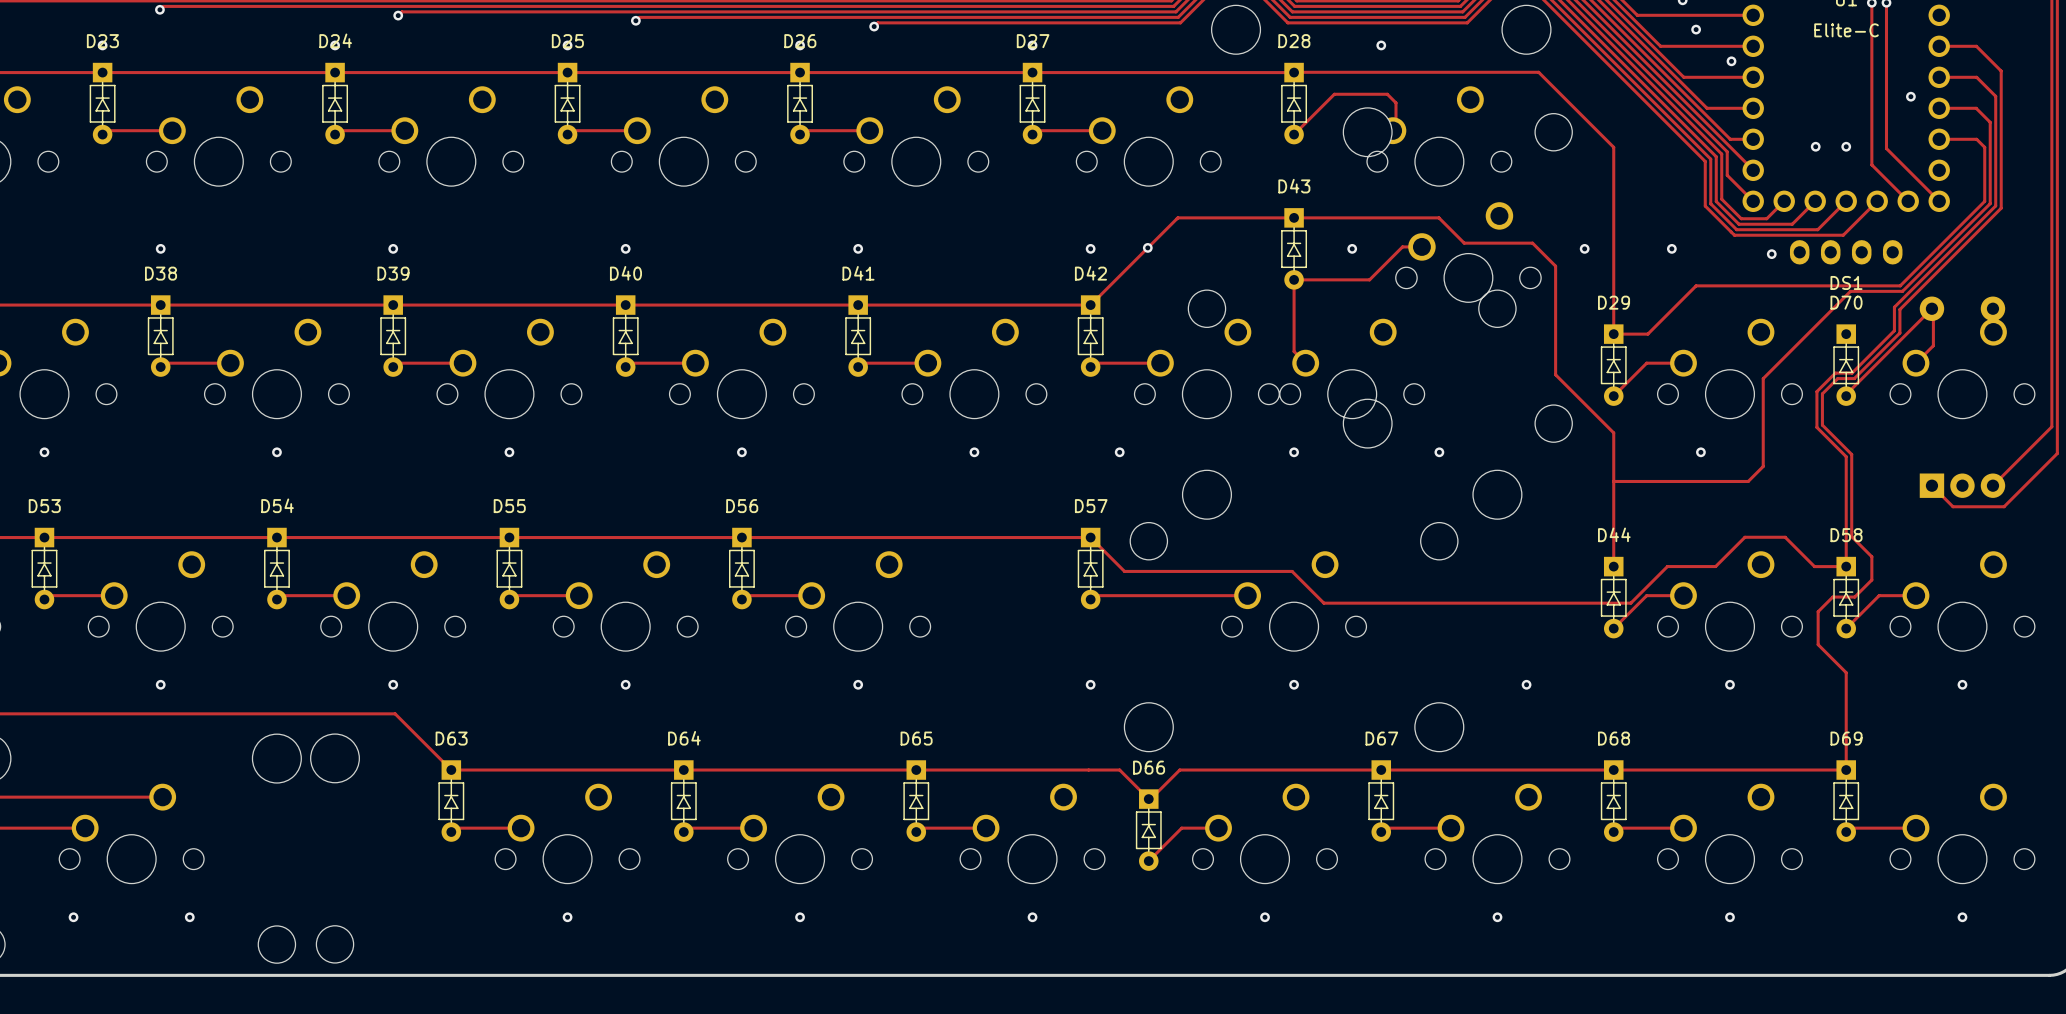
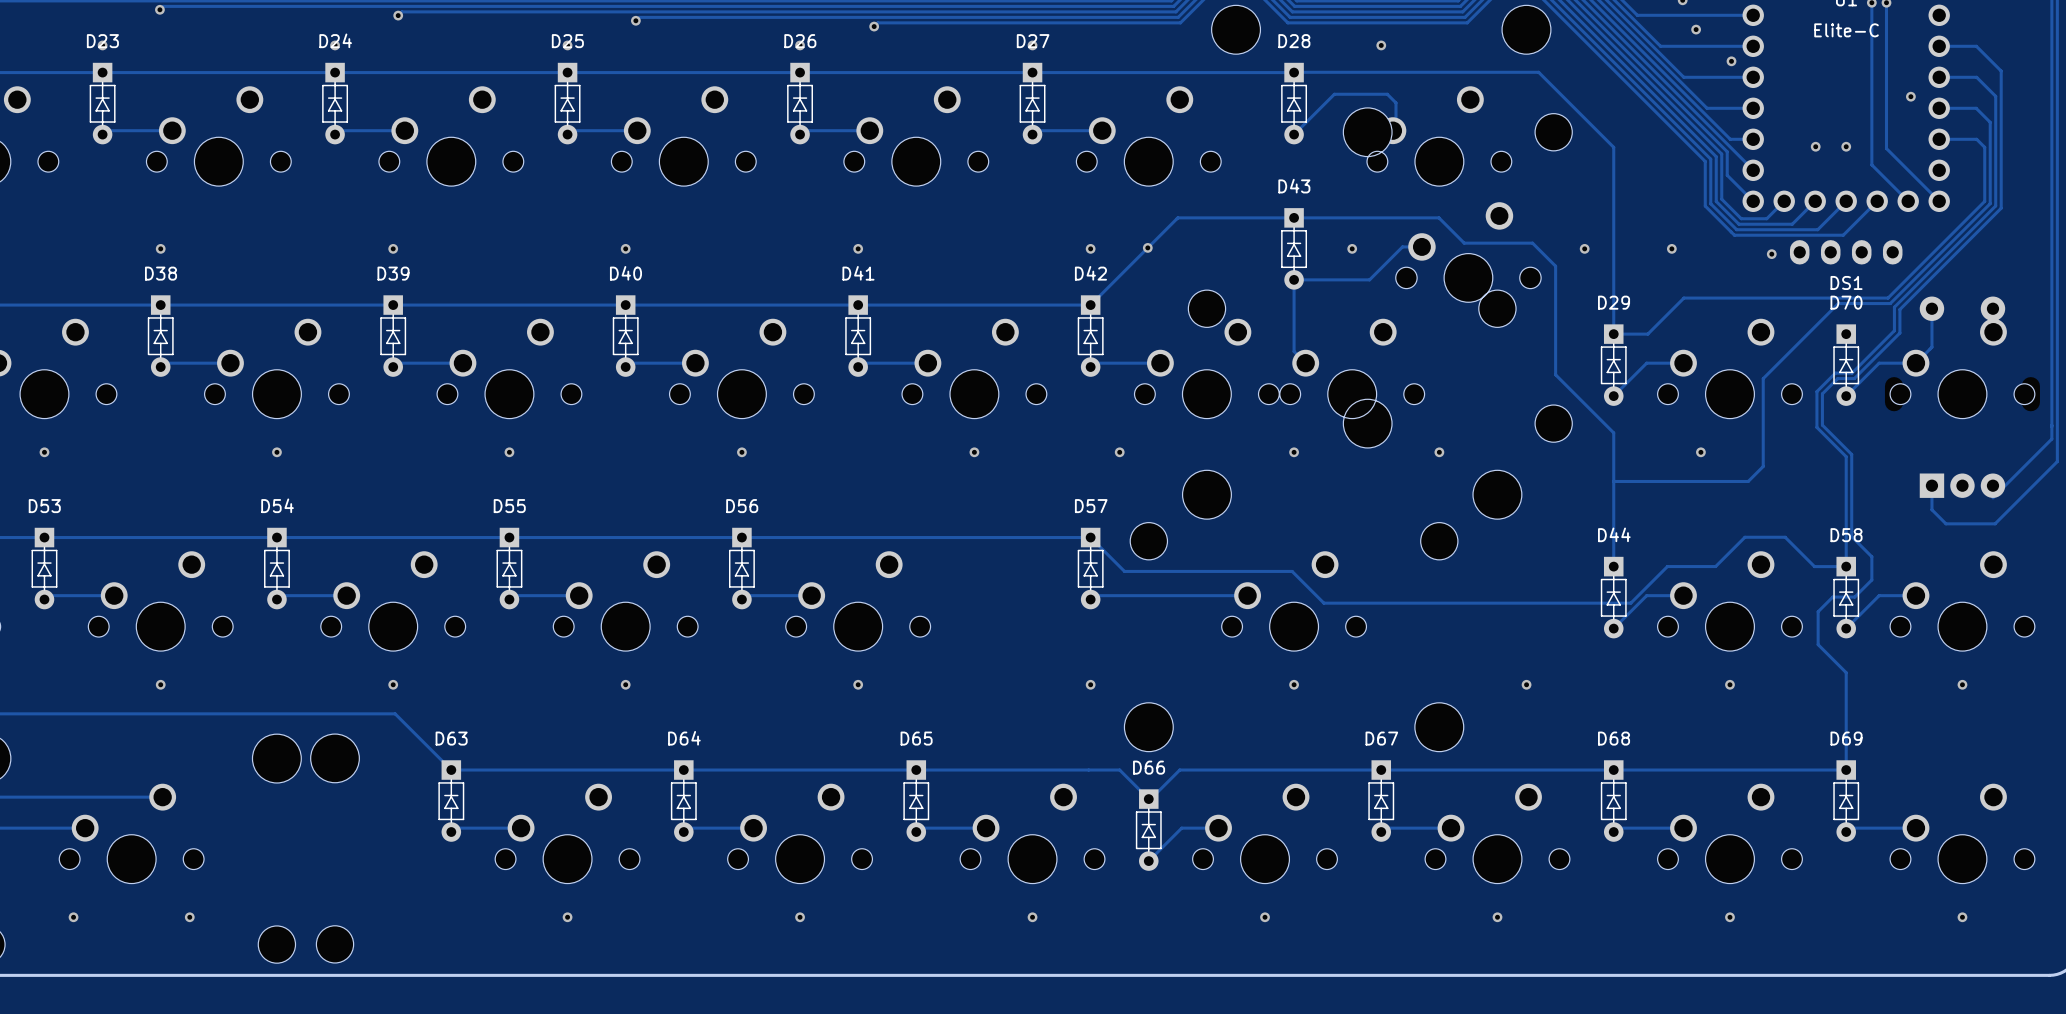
track: (1900, 285) (1696, 285) (1683, 298) -> (1900, 285) (1888, 298) (1683, 298)
track: (1902, 291) (1850, 291) (1838, 303) -> (1902, 291) (1890, 303) (1838, 303)
track: (1931, 347) (1931, 308) (1846, 394) -> (1931, 347) (1931, 320)
track: none -> (1915, 363) (1879, 363) (1846, 396)
track: (2051, 426) (1992, 485) -> (2051, 426) (2051, 439) (1992, 497)
track: (2057, 453) (2004, 506) (1953, 506) (1931, 485) -> (2057, 453) (2057, 461) (1995, 523) (1945, 523) (1931, 509) (1931, 497)

